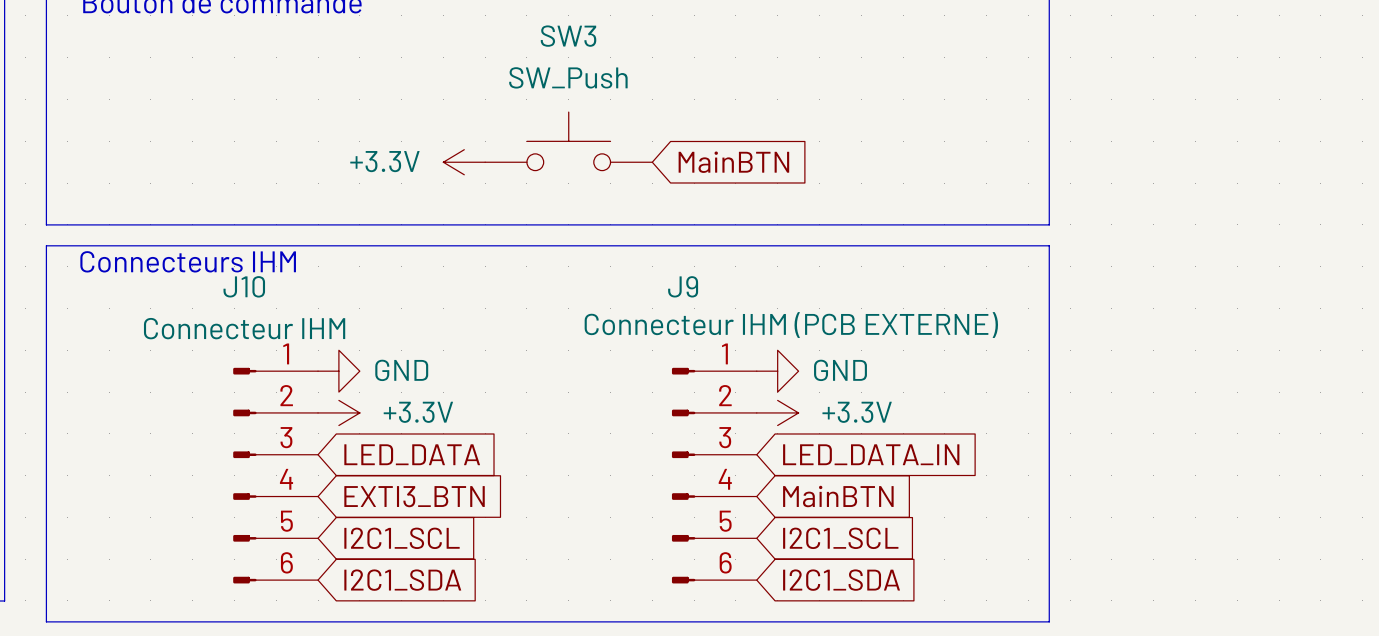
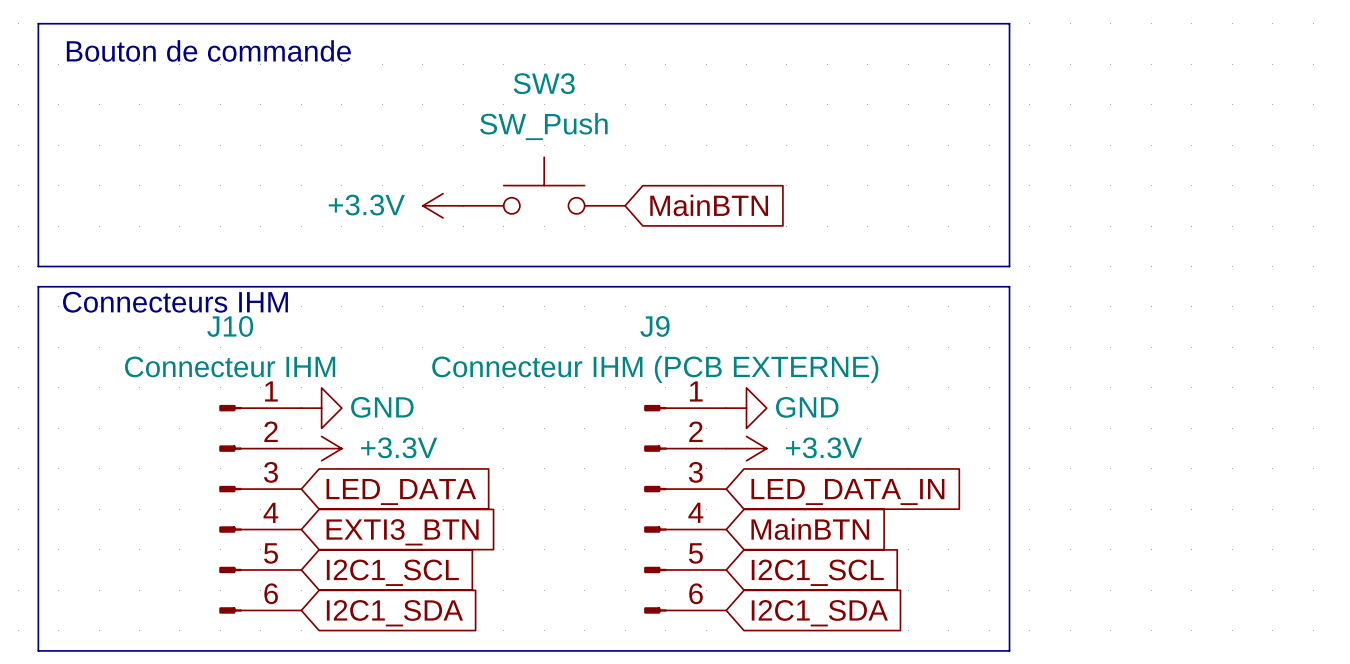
J9 value position: Connecteur IHM (PCB EXTERNE) (791, 325) -> Connecteur IHM (PCB EXTERNE) (655, 369)

